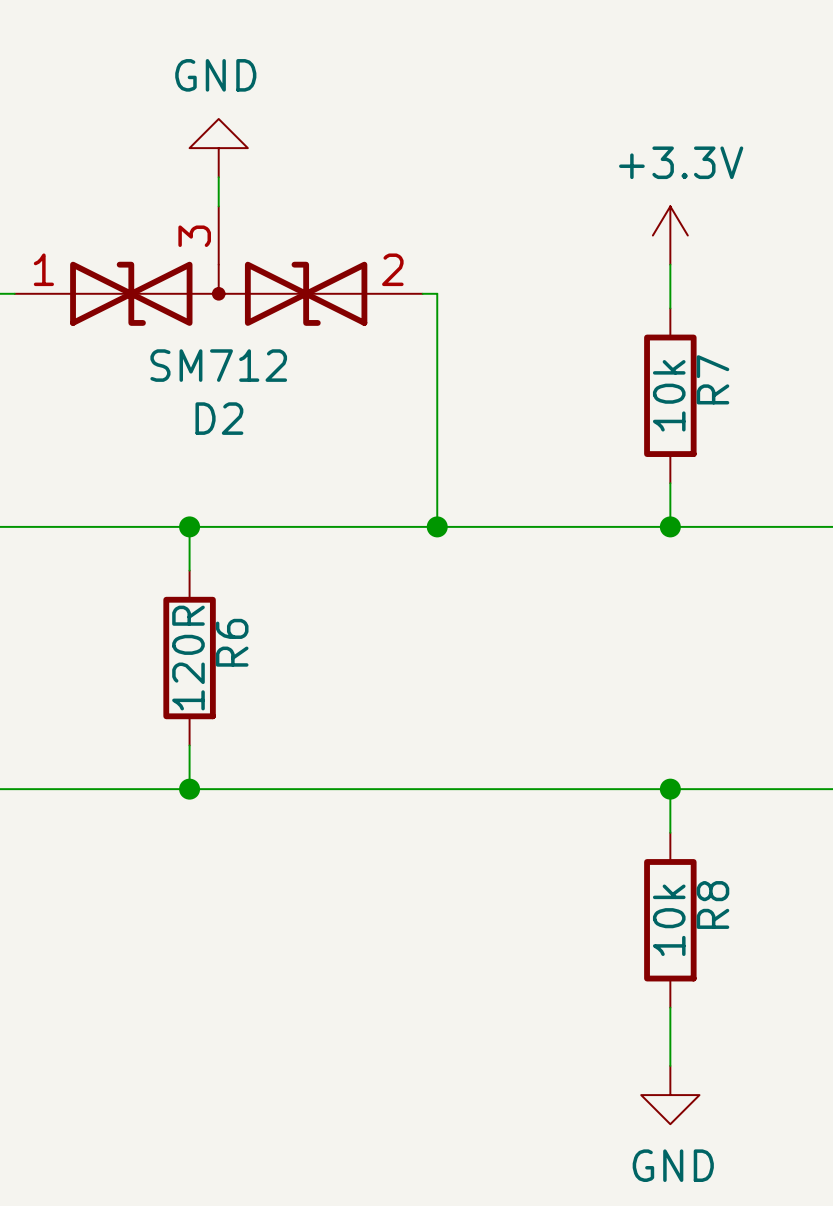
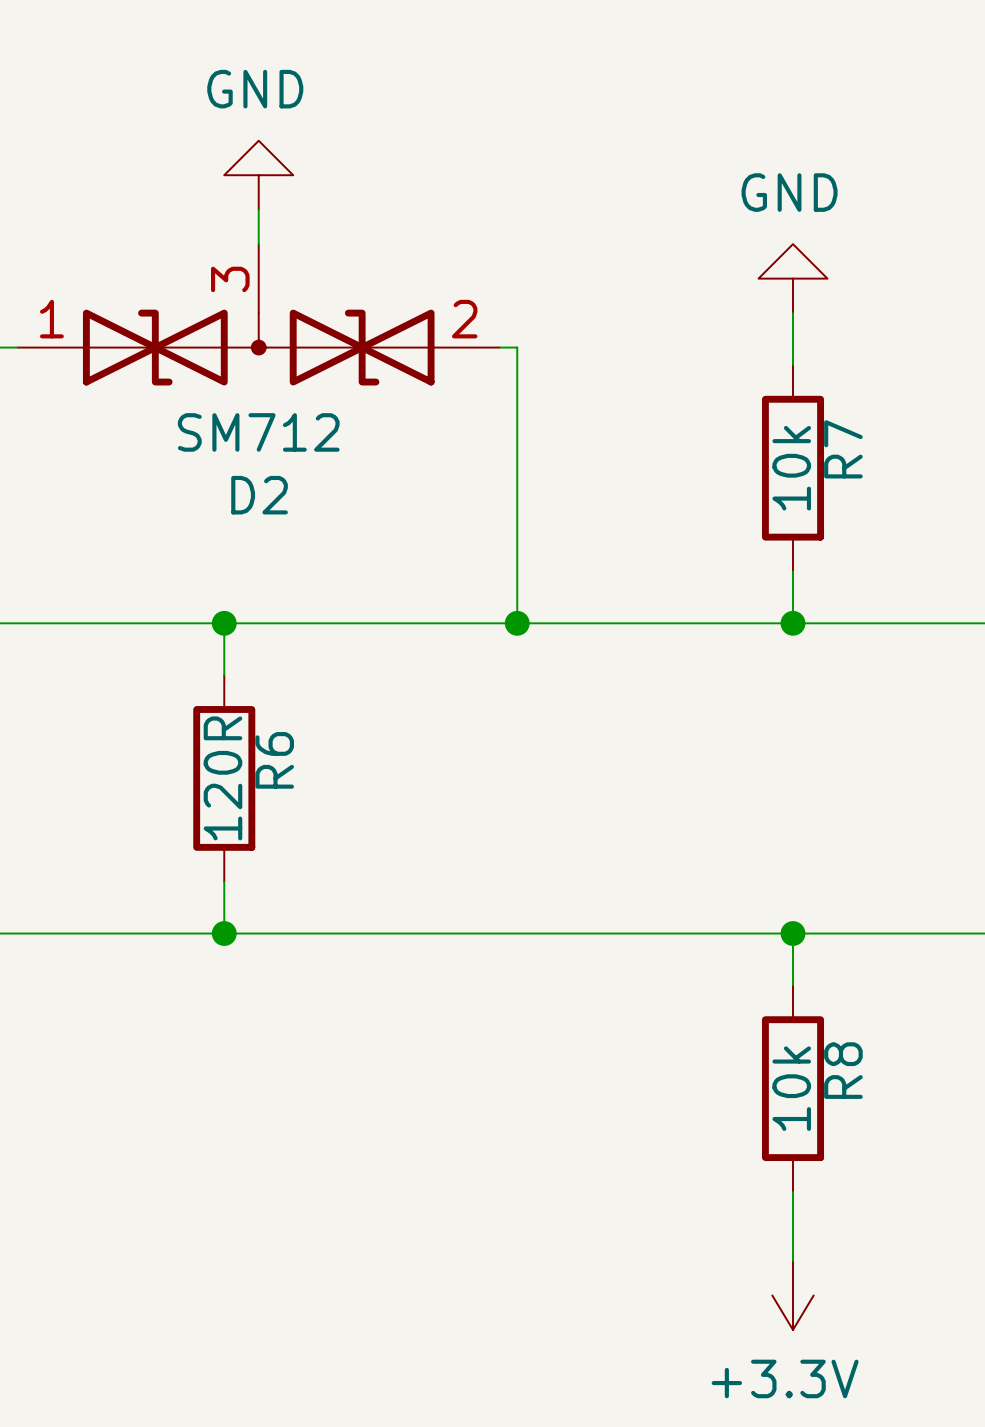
power symbol: +3.3V (670, 235) -> GND (793, 278)
power symbol: GND (670, 1095) -> +3.3V (793, 1295)

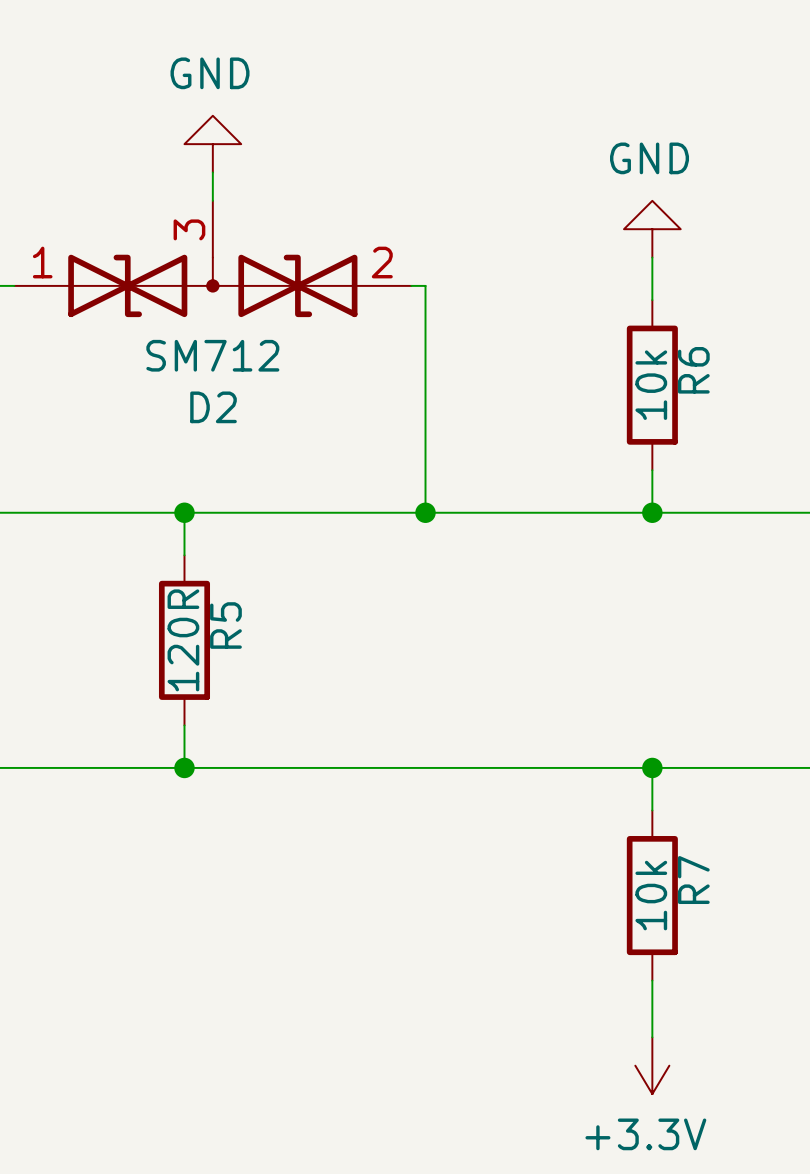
R7 name: R7 (843, 449) -> R6 (693, 370)
R6 name: R6 (274, 760) -> R5 (225, 625)
R8 name: R8 (843, 1070) -> R7 (693, 880)

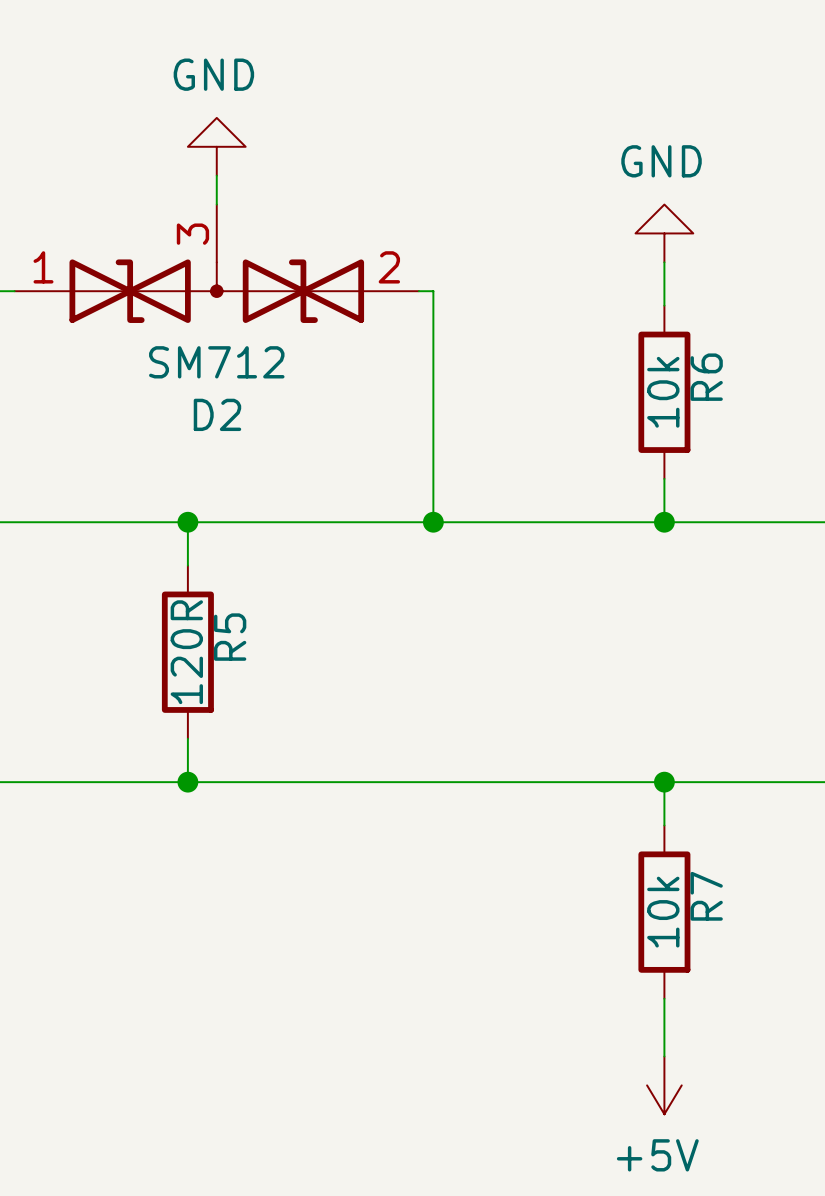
power symbol: +3.3V (652, 1065) -> +5V (664, 1085)

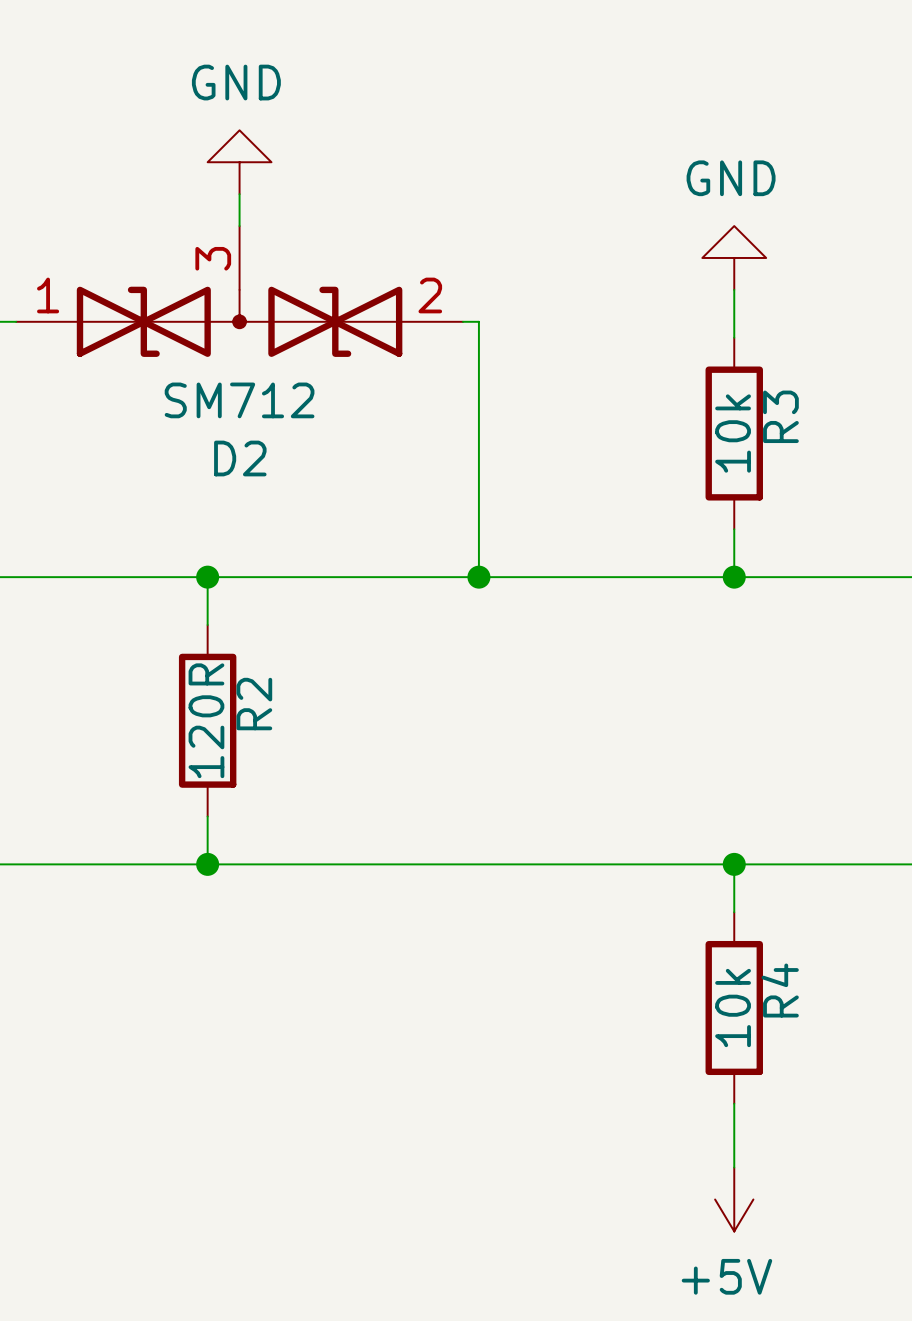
R6 name: R6 (706, 377) -> R3 (780, 416)
R5 name: R5 (230, 637) -> R2 (254, 704)
R7 name: R7 (706, 896) -> R4 (780, 990)

